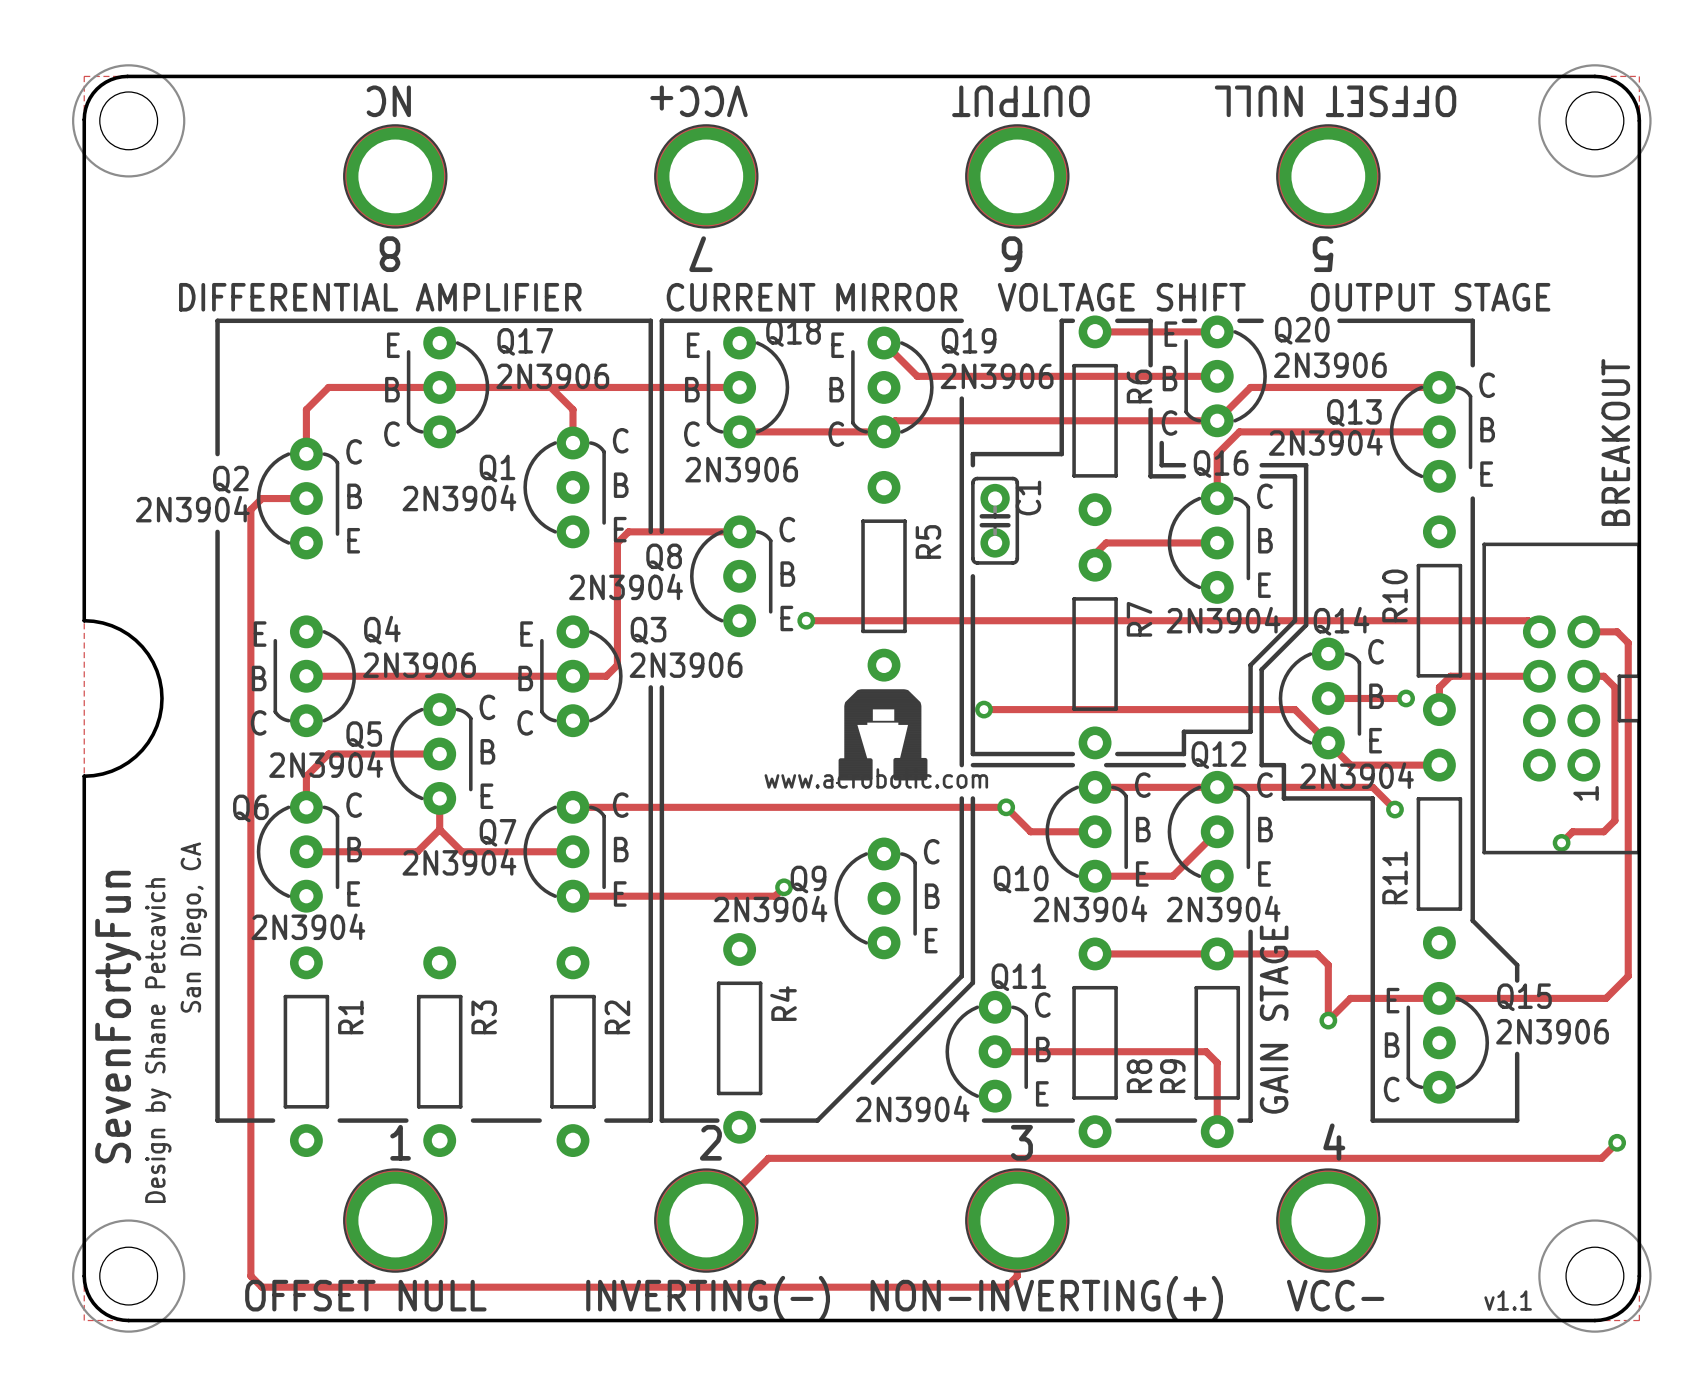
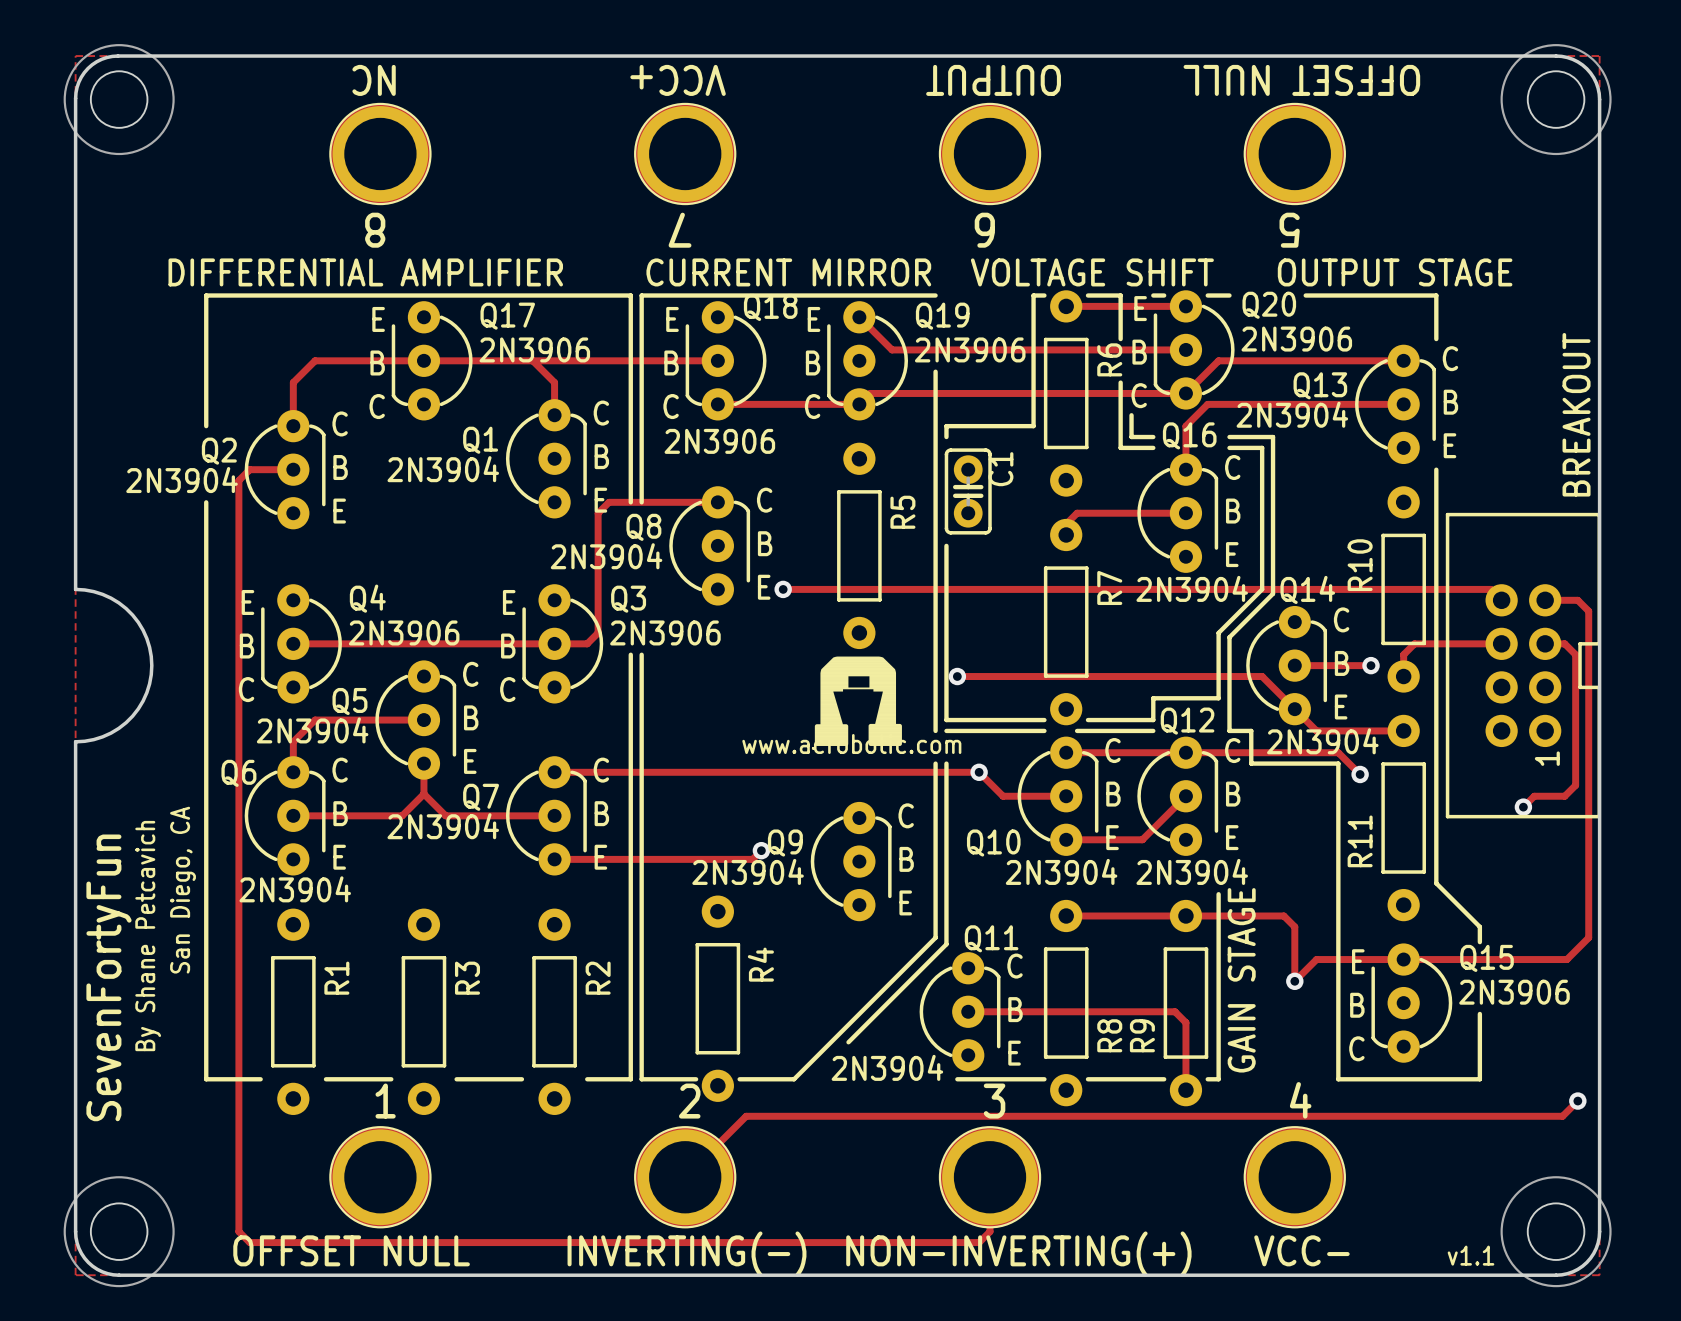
text: Design by Shane Petcavich (158, 1040) -> By Shane Petcavich (148, 936)

